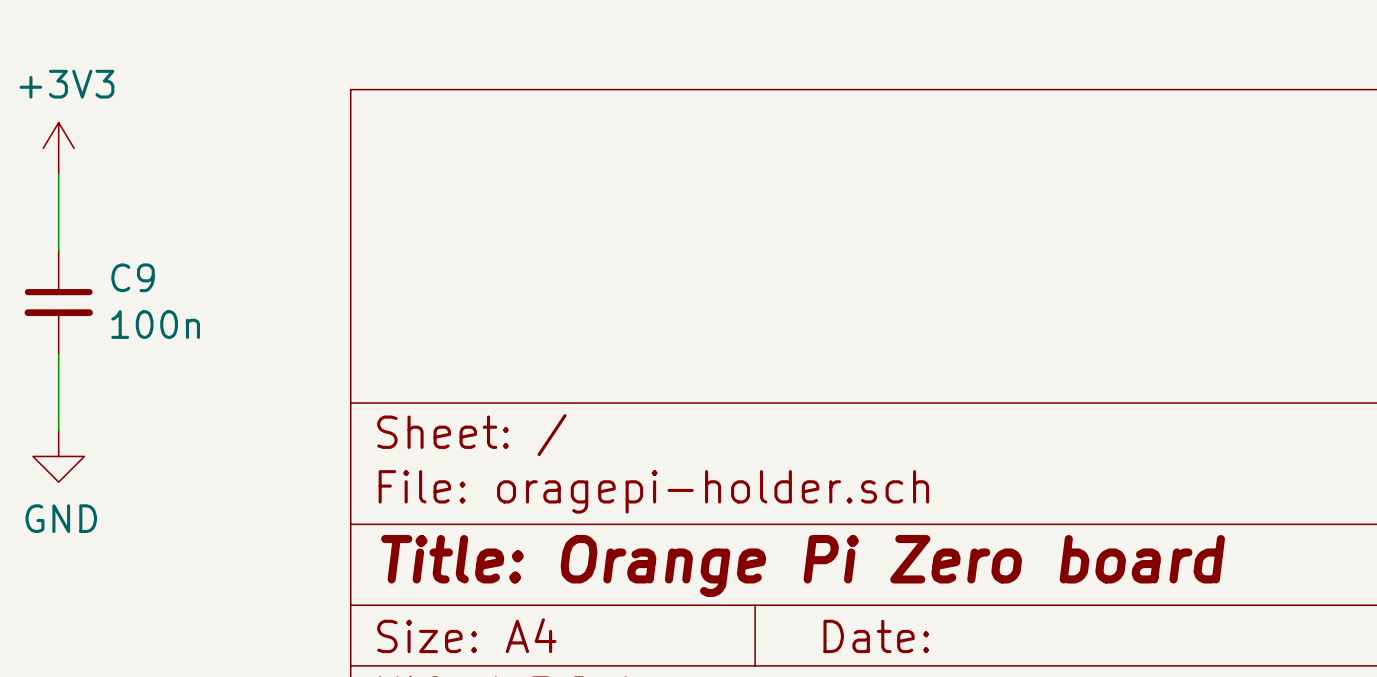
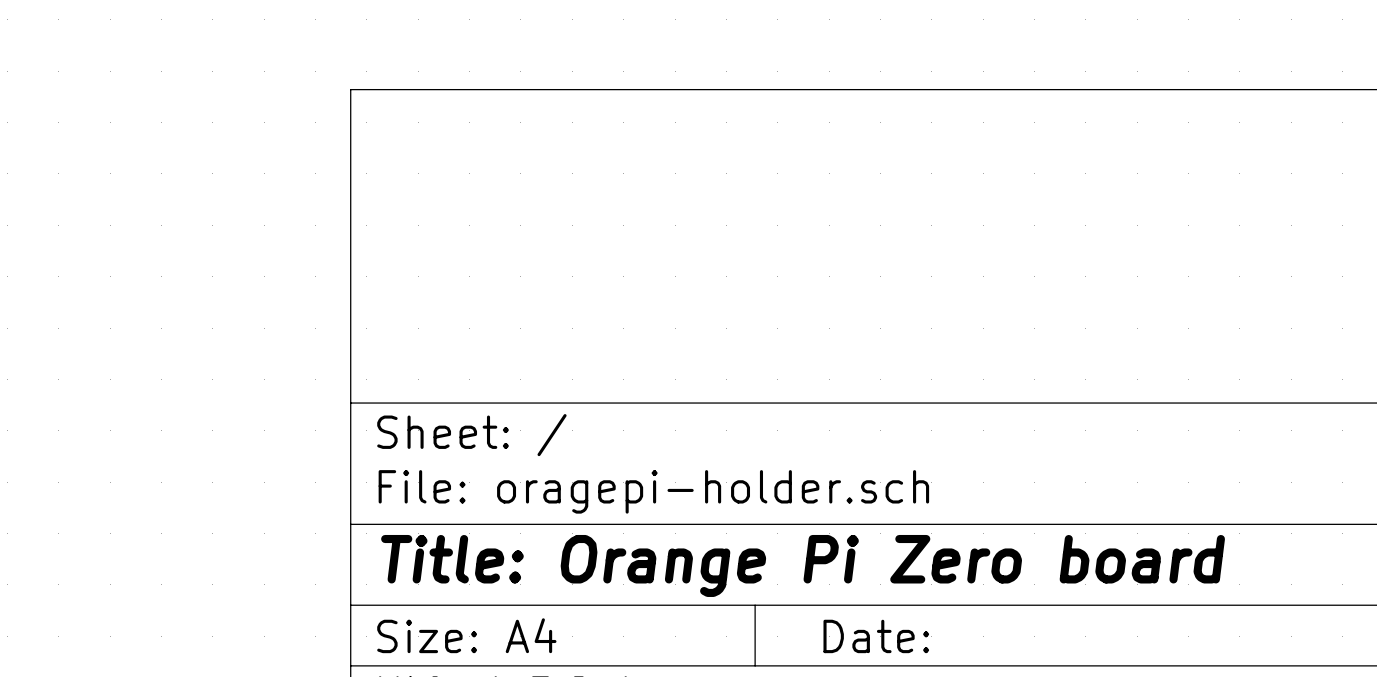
power symbol: +3V3 (58, 148) -> none
wire: (58, 173) (58, 251) -> none
C9: 100n (58, 302) -> none
wire: (58, 353) (58, 430) -> none
power symbol: GND (58, 456) -> none

